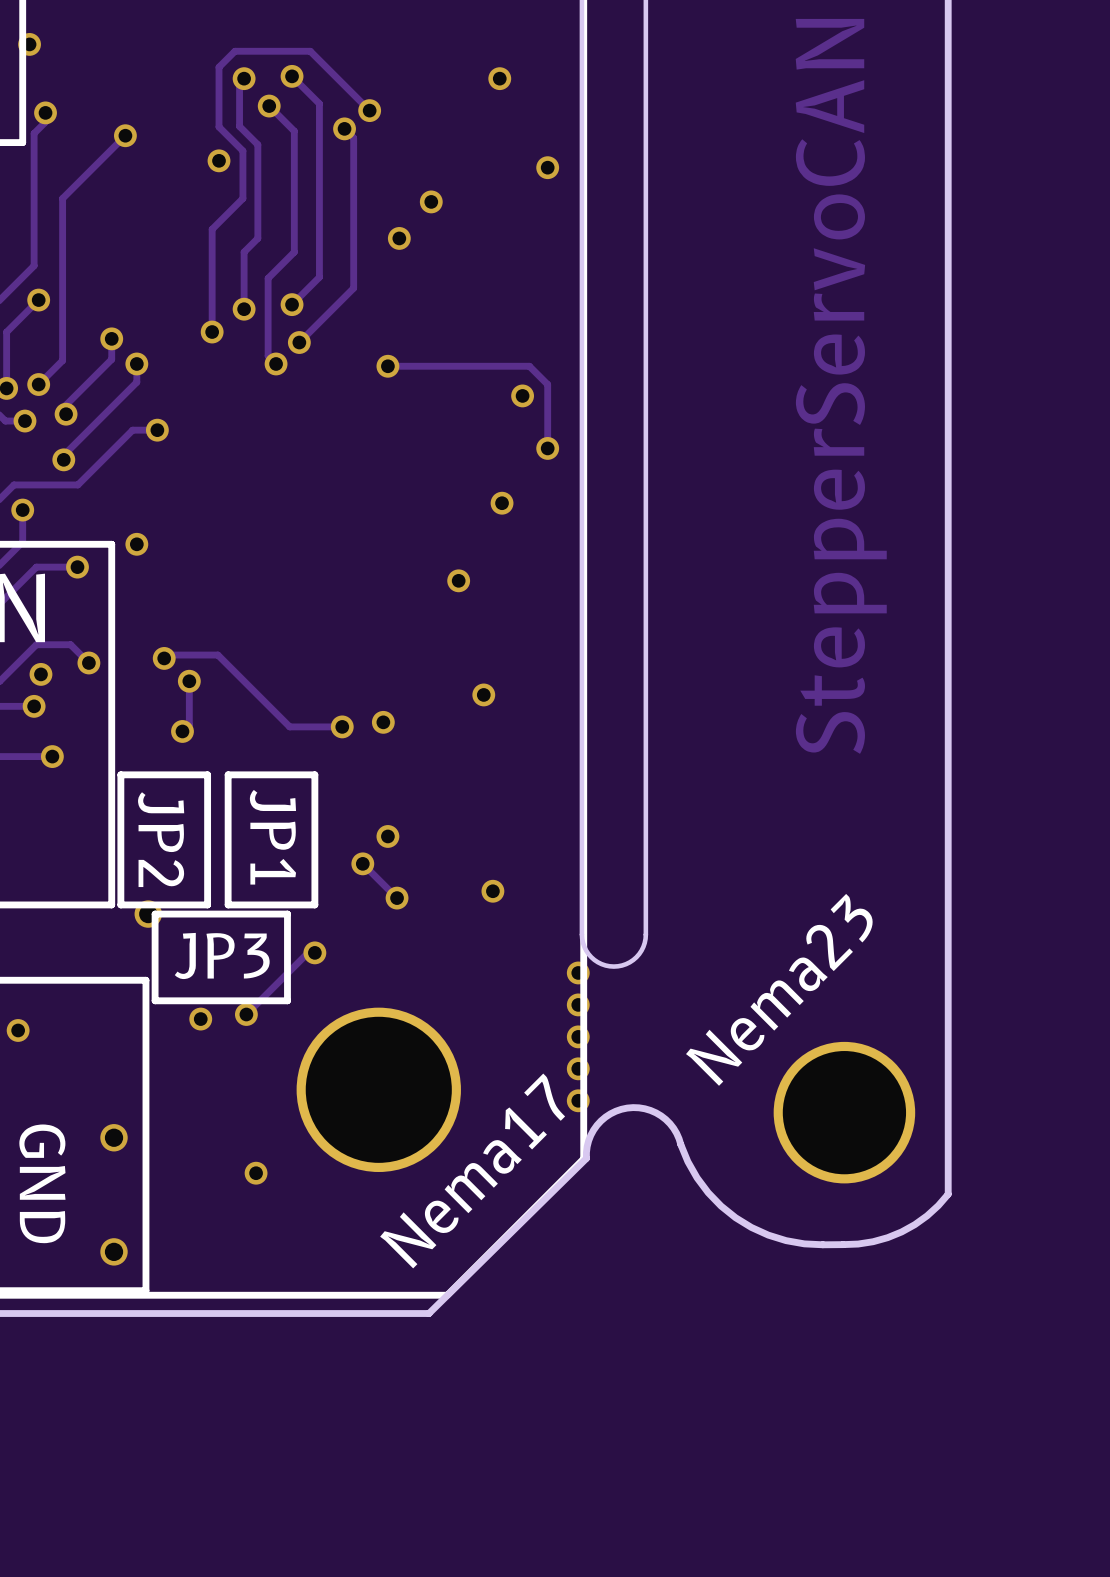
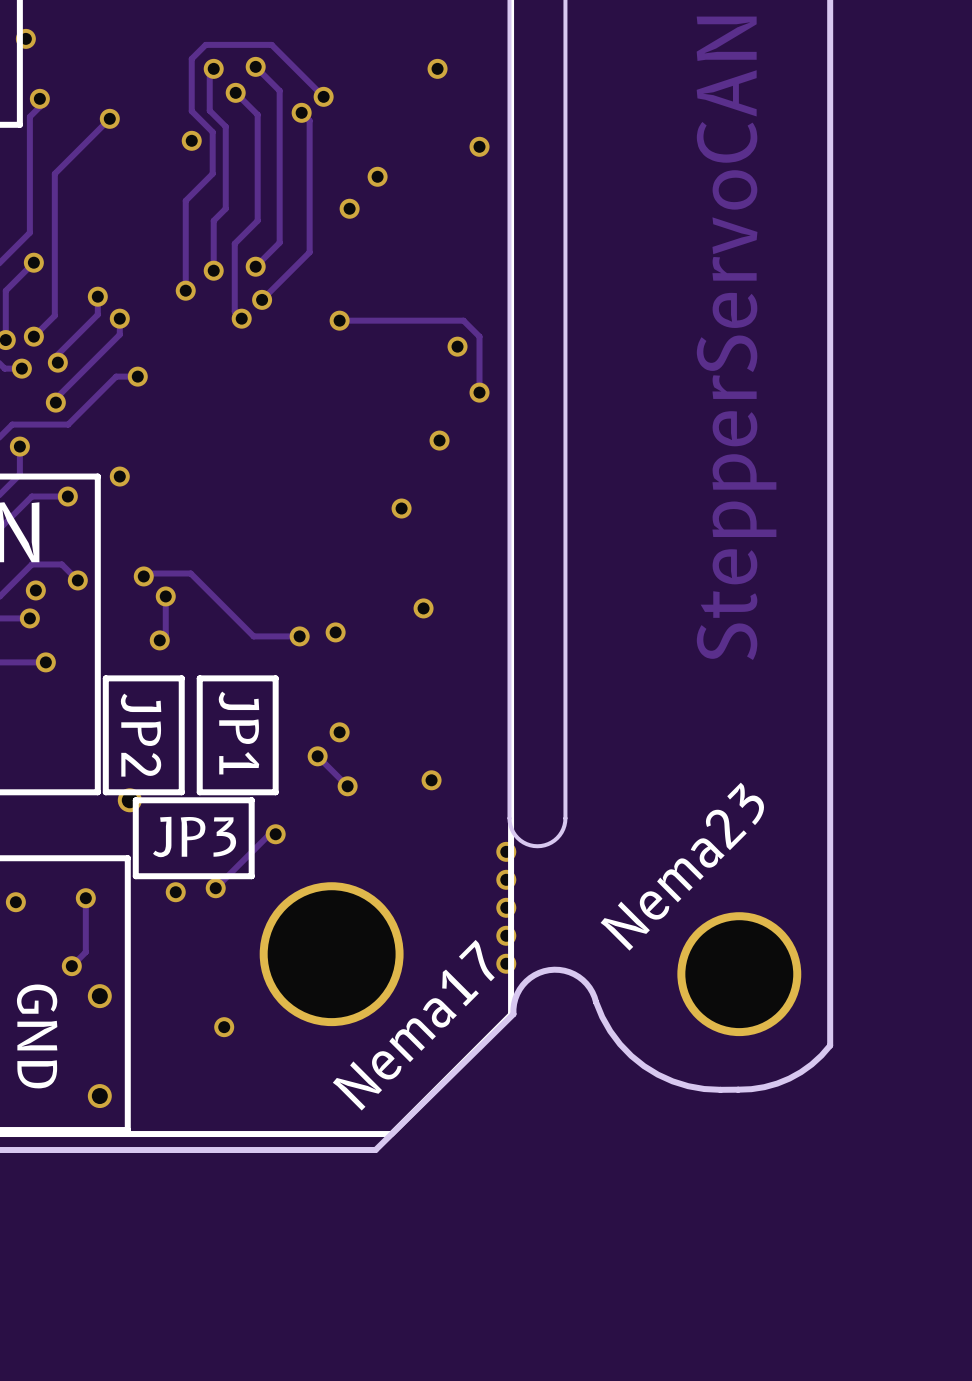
track: none -> (85, 898) (85, 952) (71, 966)
via: none -> (85, 898)
via: none -> (71, 966)

